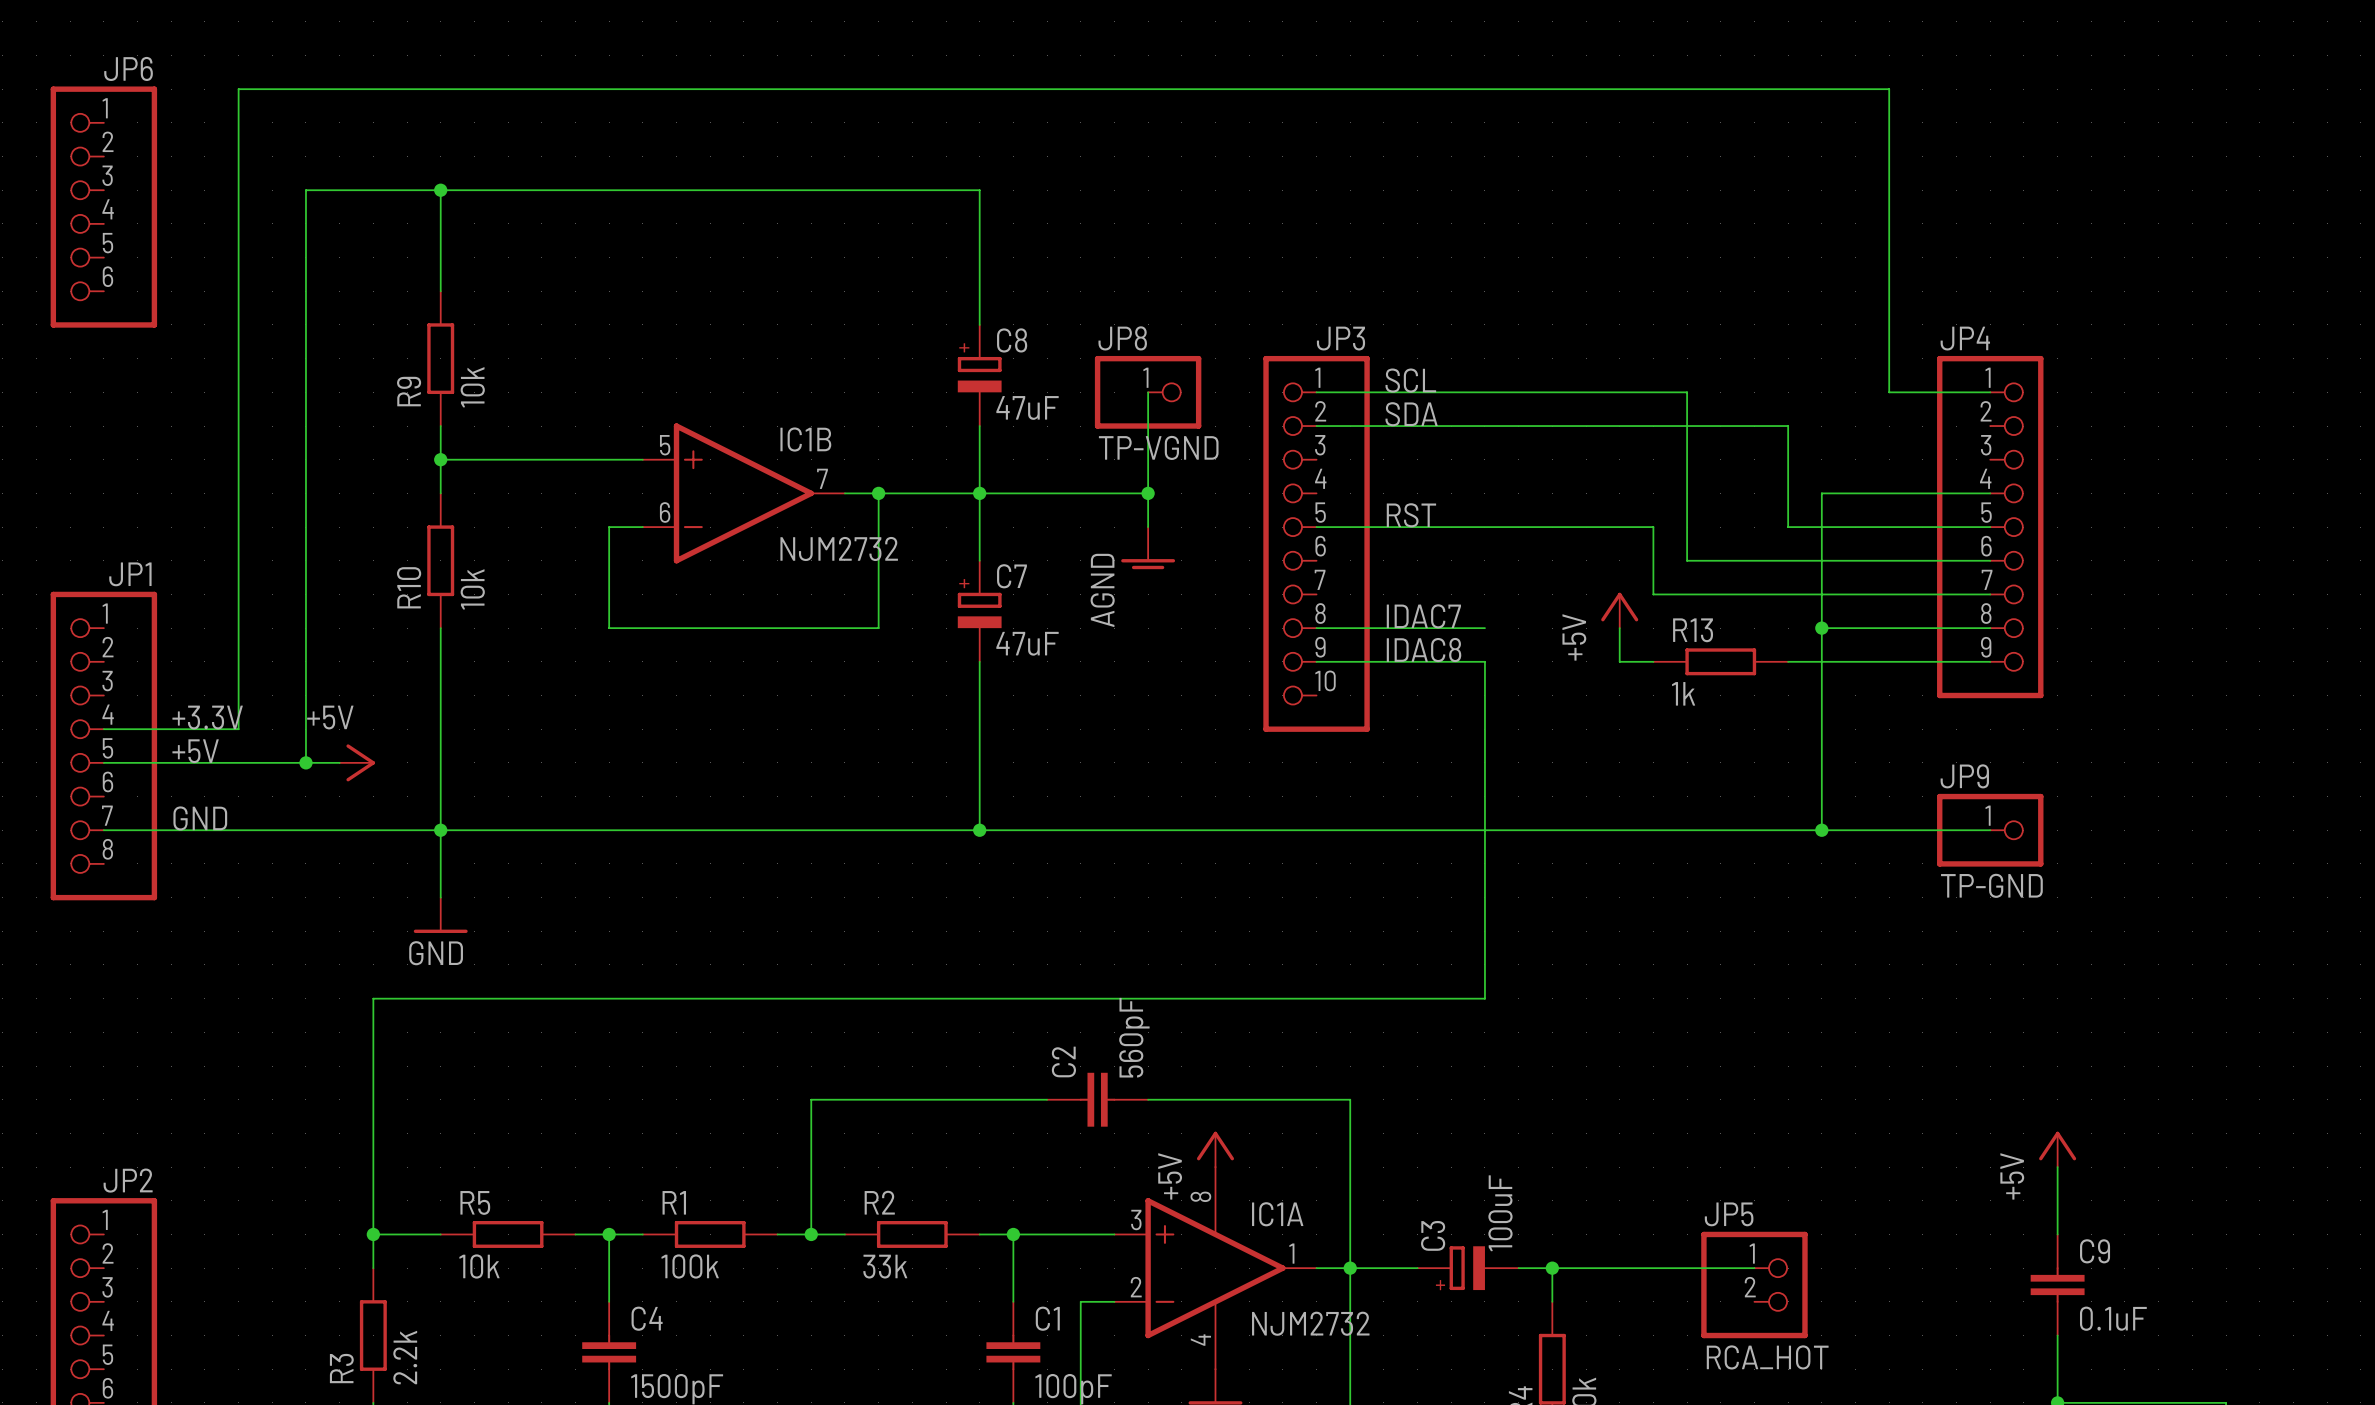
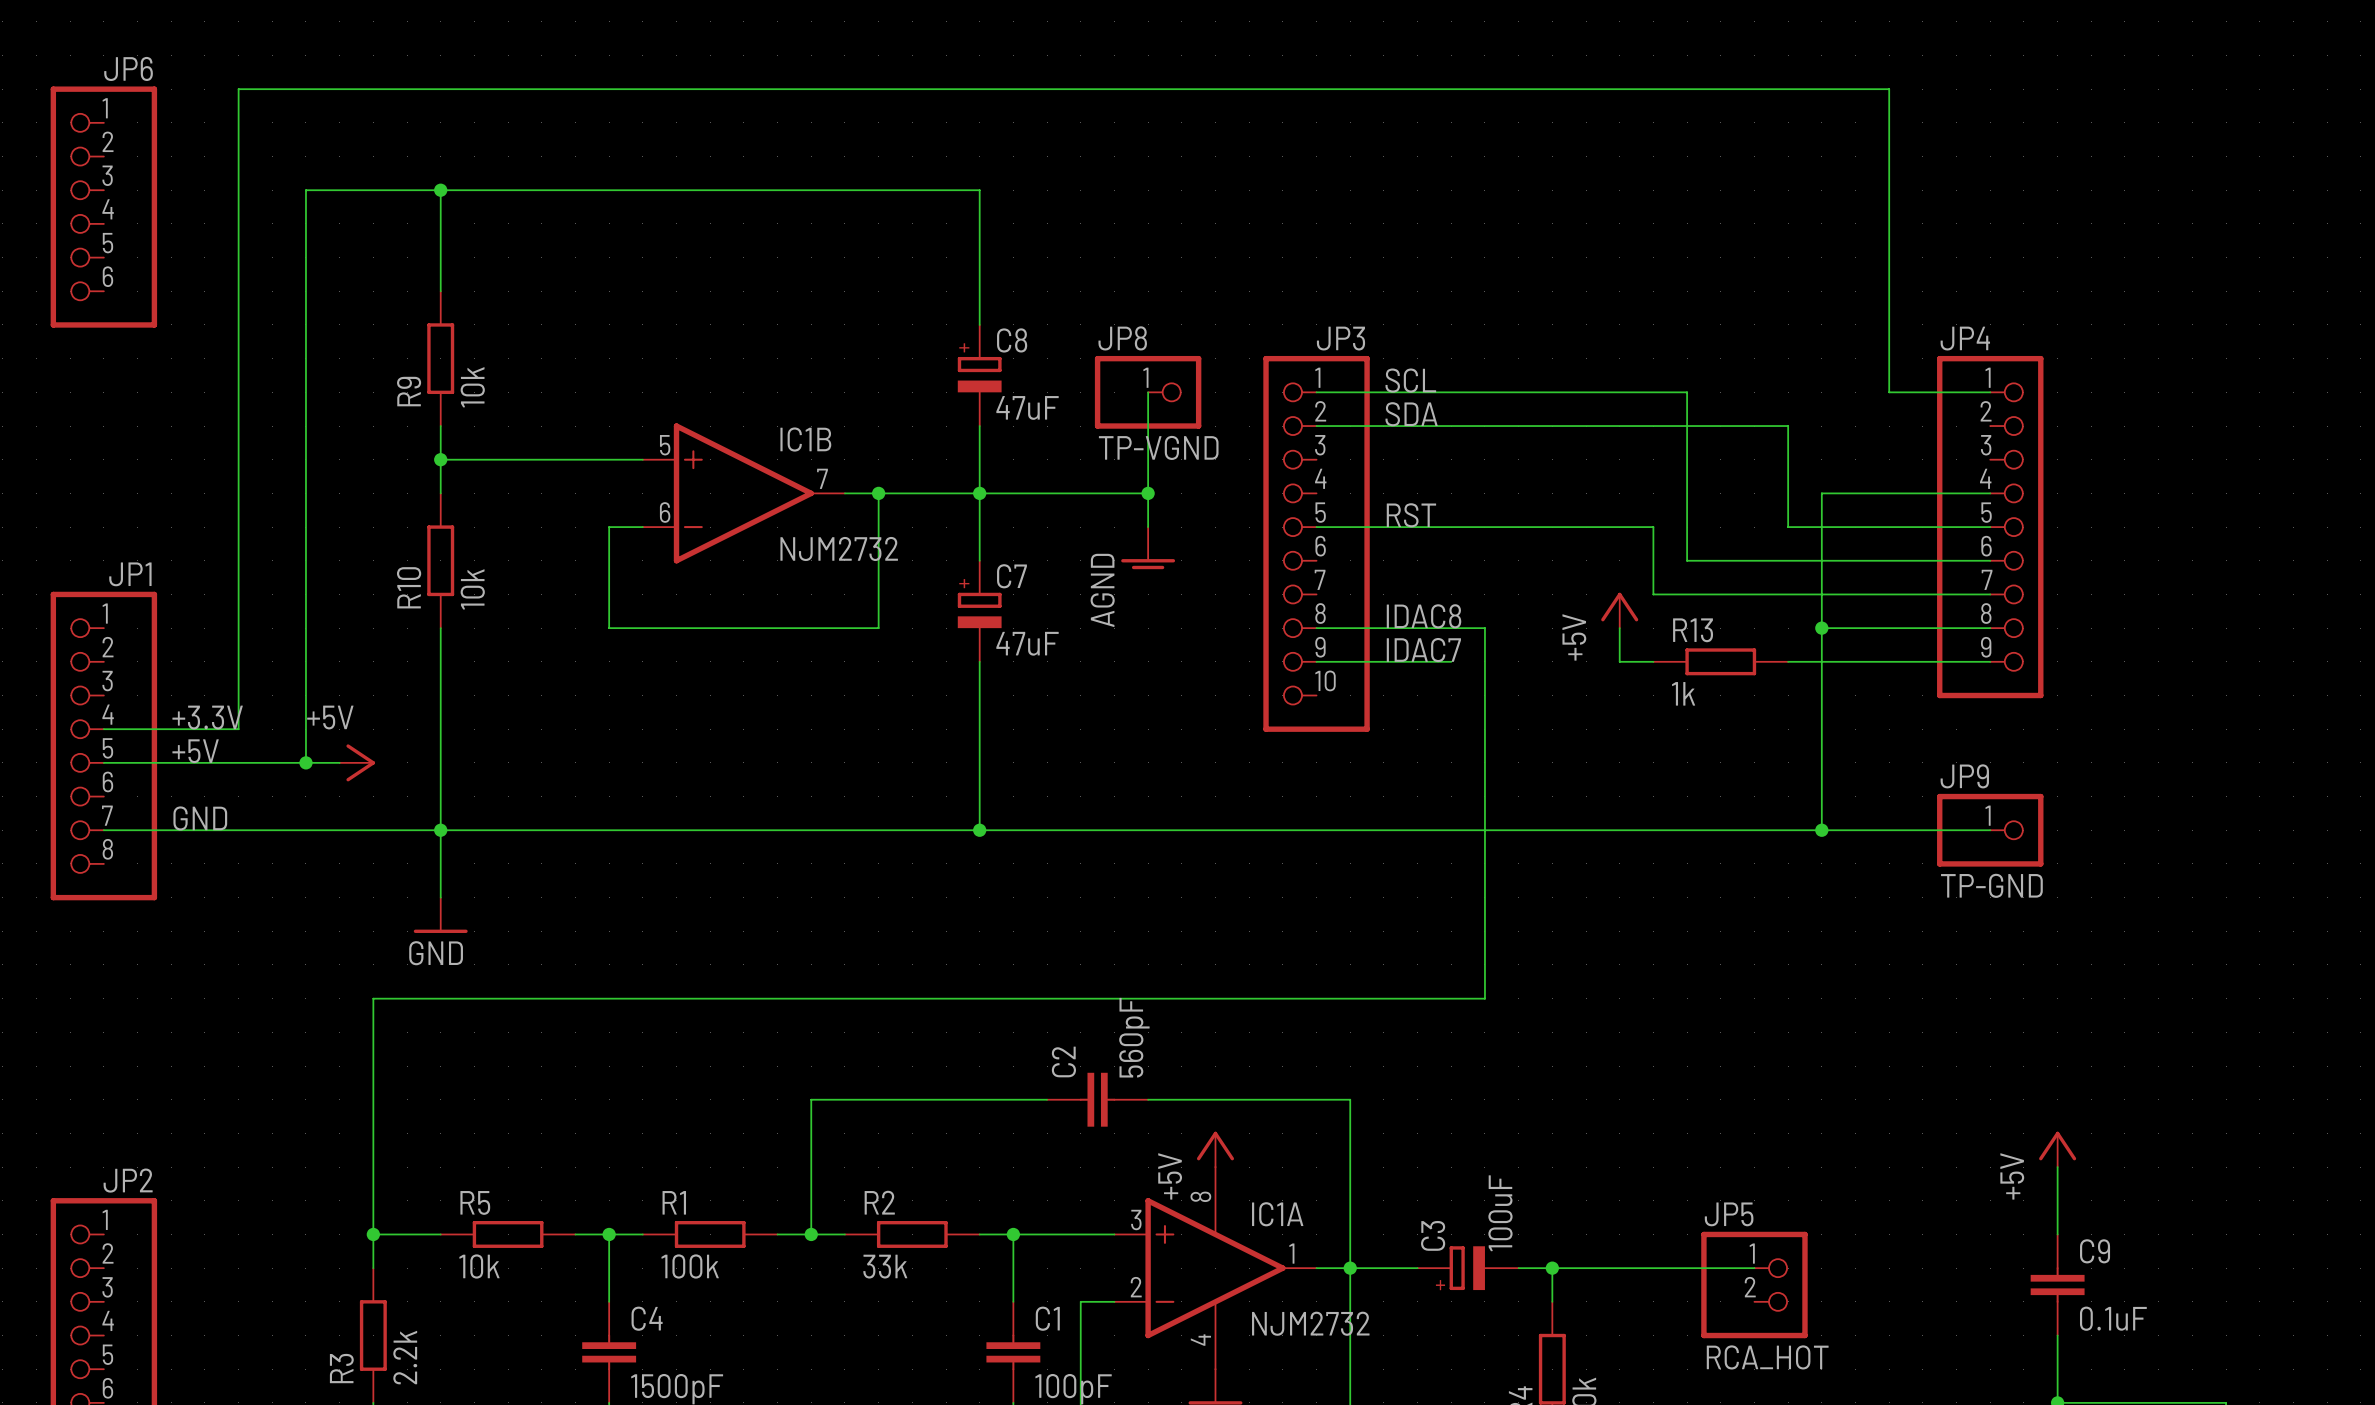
label: IDAC7 (1423, 616) -> IDAC8 (1424, 616)
label: IDAC8 (1424, 650) -> IDAC7 (1423, 650)
wire: (1451, 661) (1484, 661) -> (1484, 628) (1484, 661)

